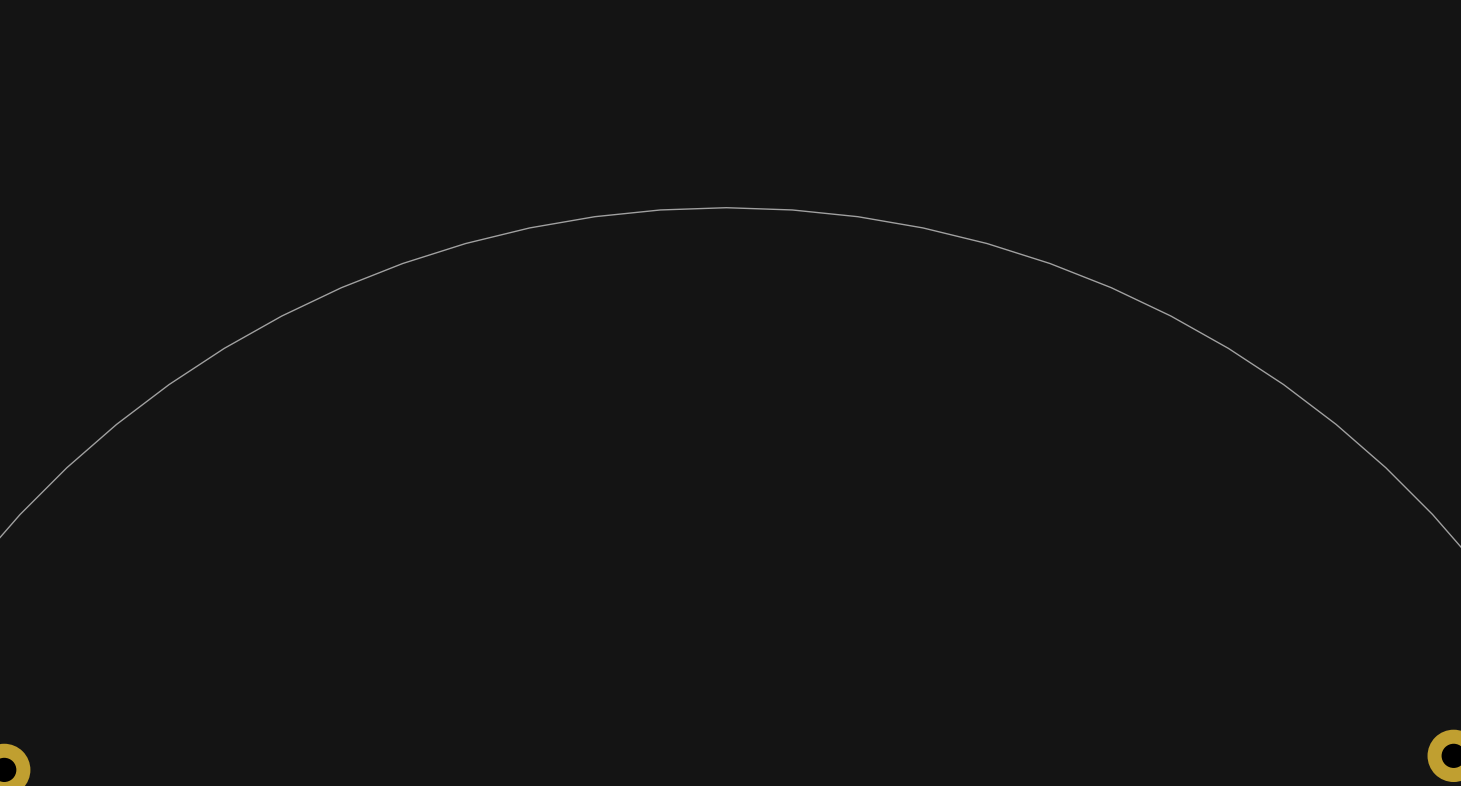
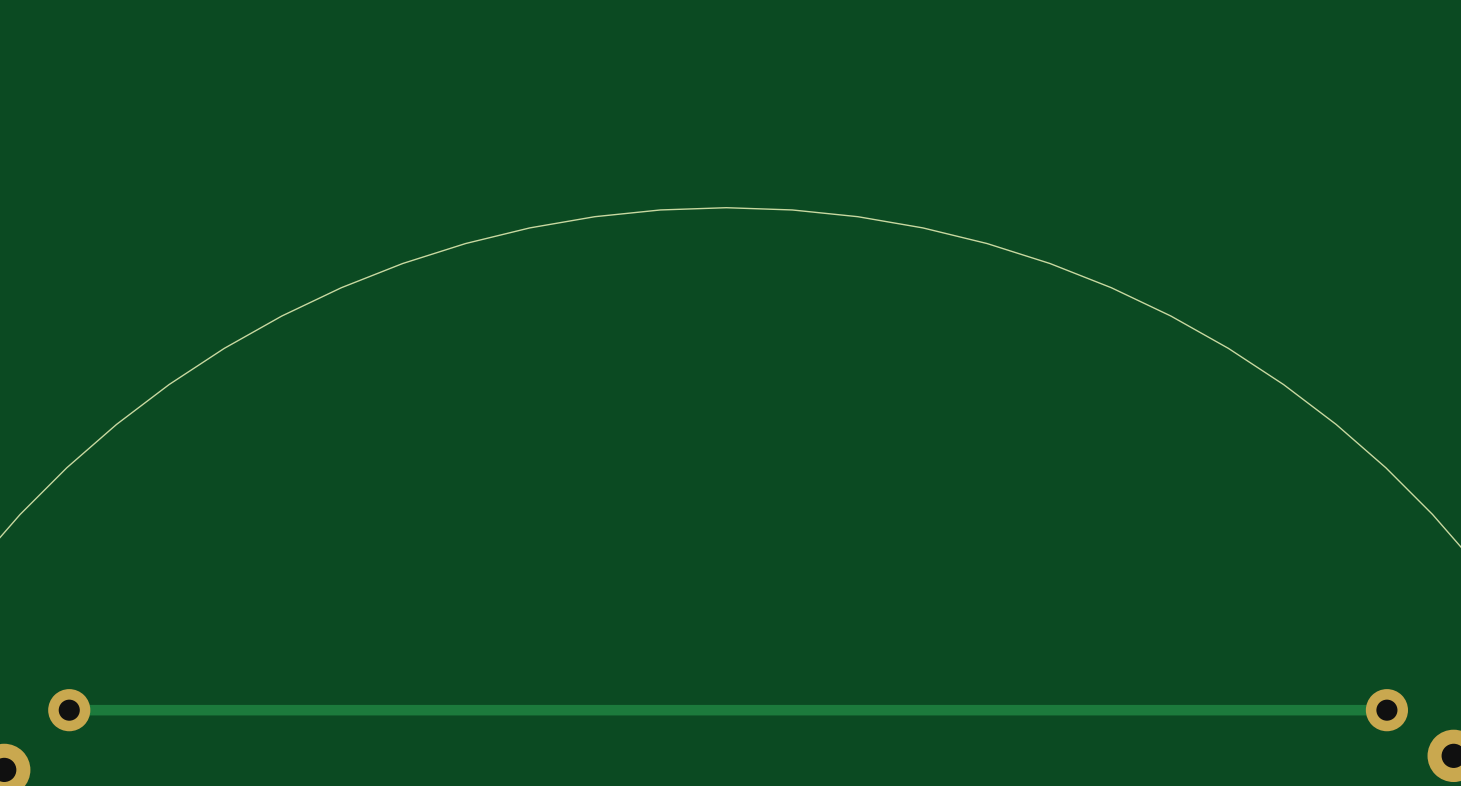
via: none -> (69, 710)
track: none -> (1386, 710) (69, 710)
via: none -> (1386, 710)

